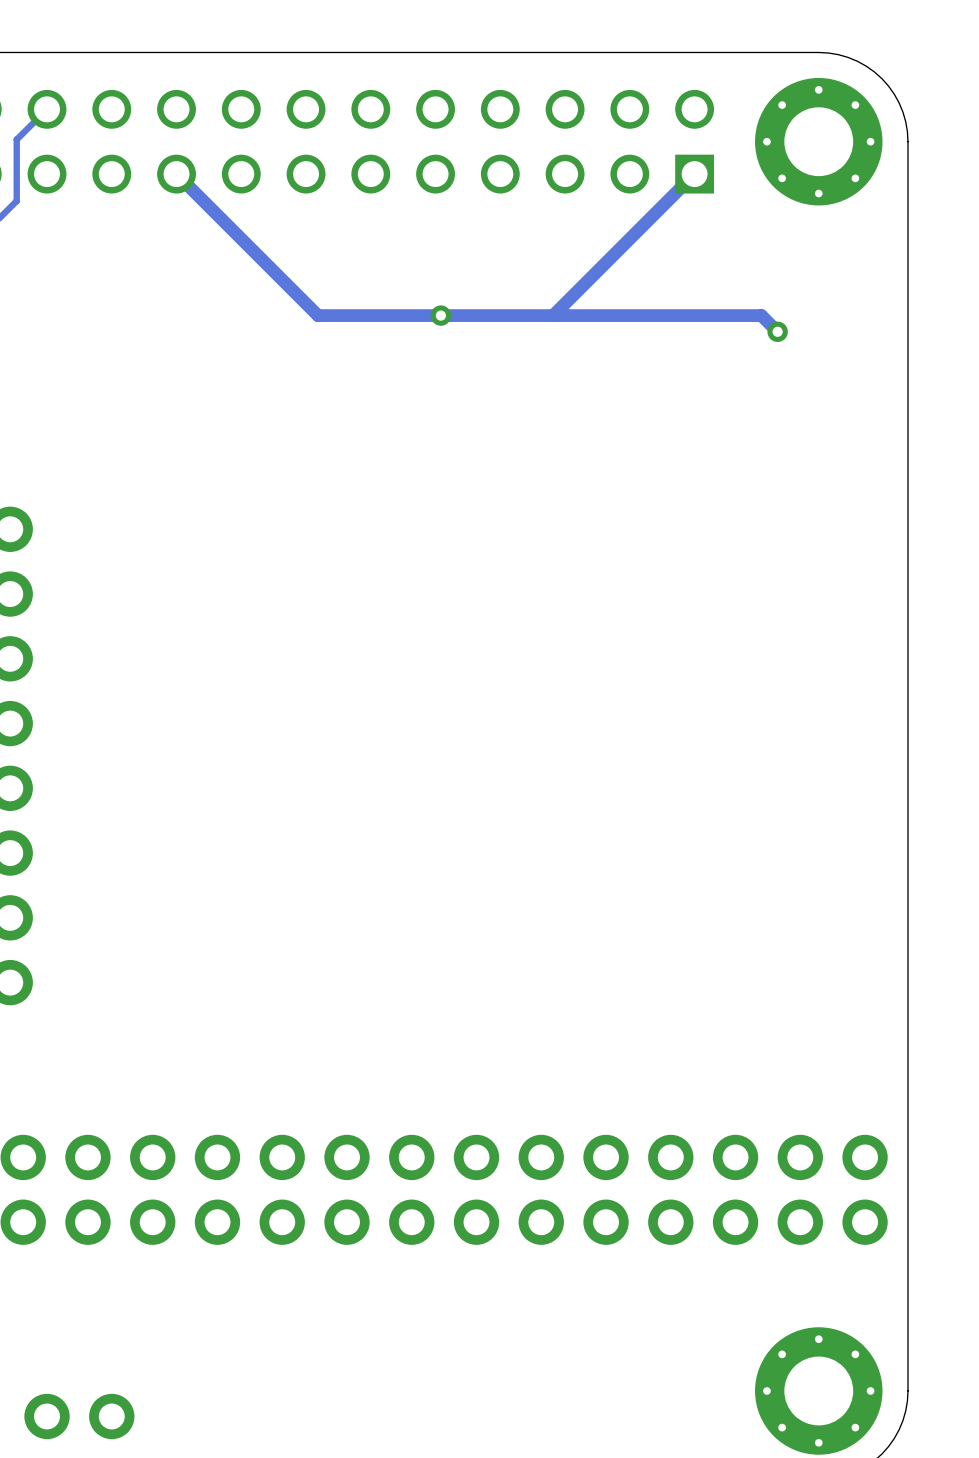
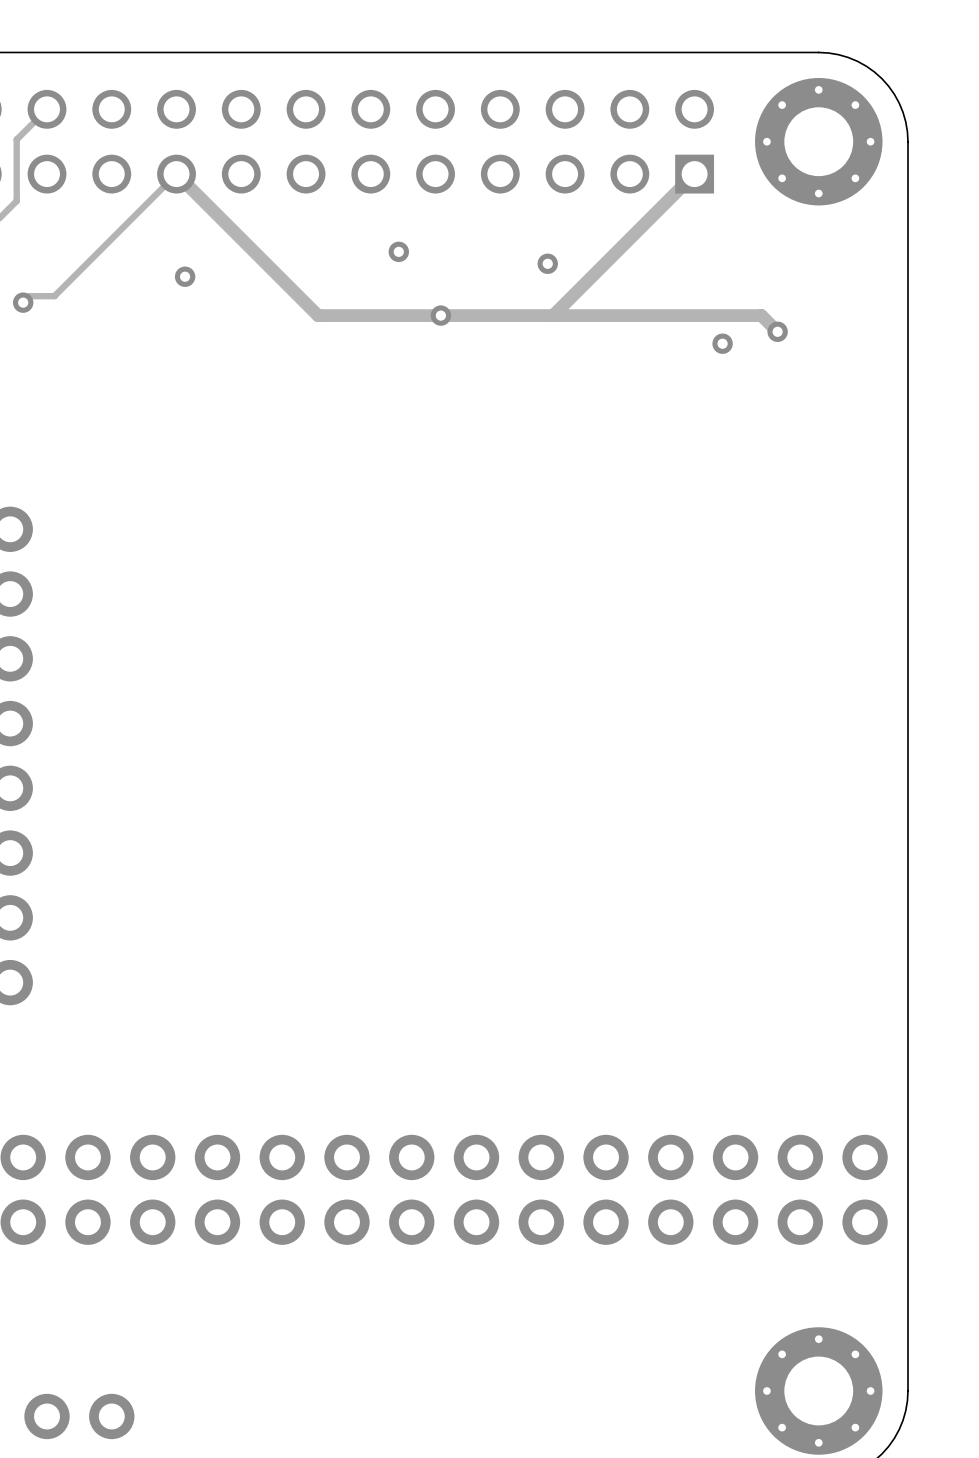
track: none -> (176, 174) (54, 296) (29, 296) (23, 302)
via: none -> (398, 251)
via: none -> (547, 263)
via: none -> (185, 276)
via: none -> (23, 302)
via: none -> (722, 343)

